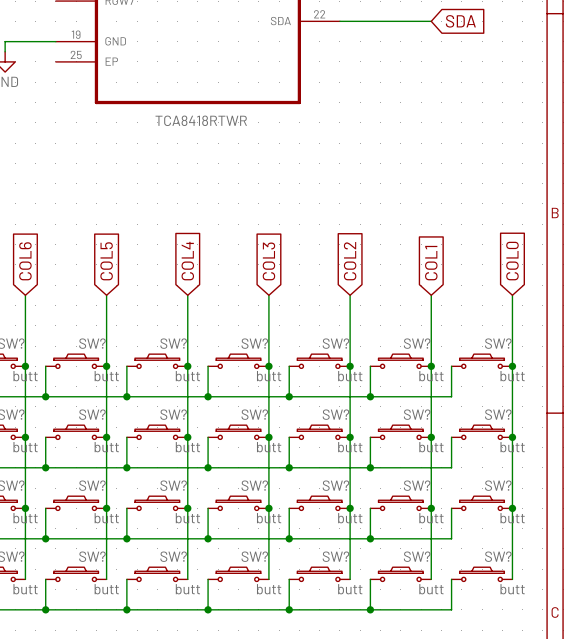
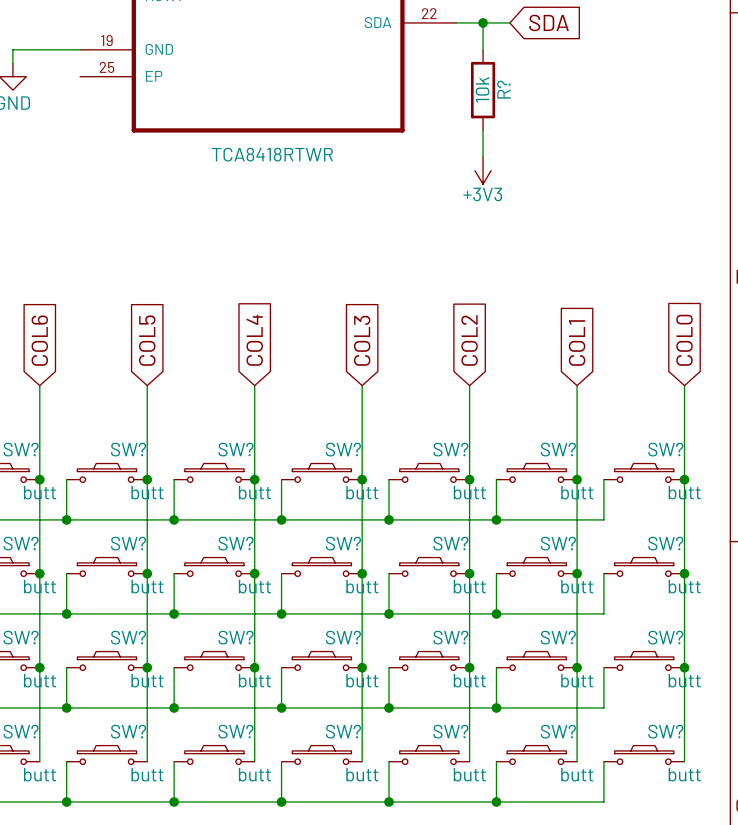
wire: none -> (483, 22) (483, 49)
junction: none -> (483, 22)
wire: (380, 21) (431, 21) -> none
global label position: SDA (460, 21) -> SDA (549, 22)
R?: none -> 10k (483, 90)
wire: none -> (483, 130) (483, 157)
power symbol: none -> +3V3 (483, 170)

